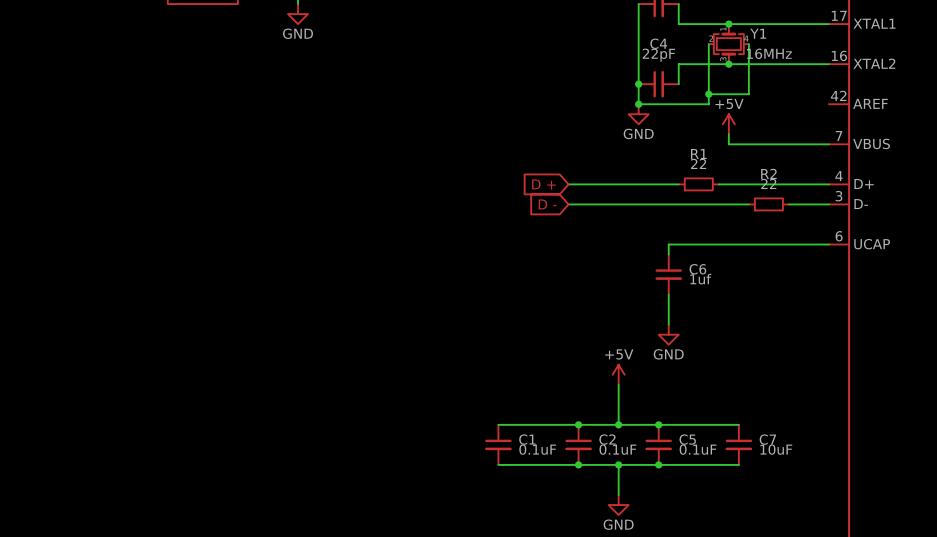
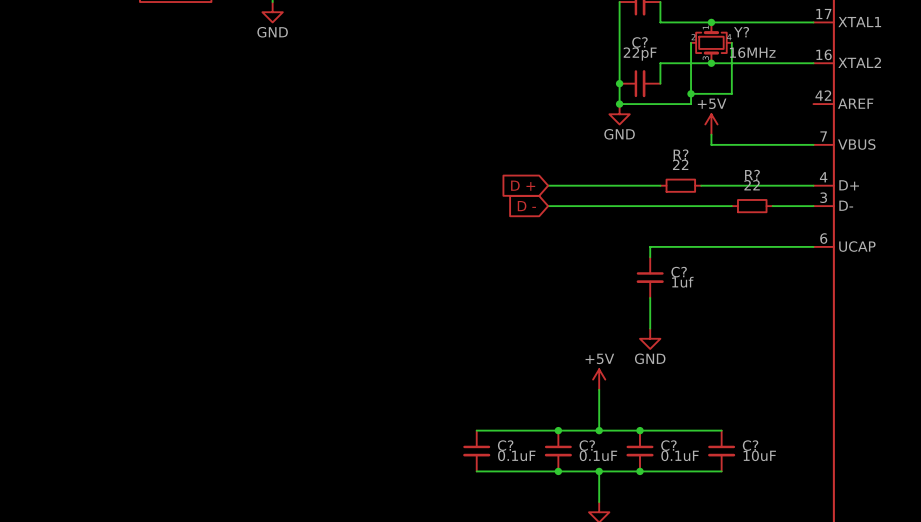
Y1 name: Y1 (758, 33) -> Y? (741, 32)
C4 name: C4 (658, 43) -> C? (639, 42)
R1 name: R1 (698, 153) -> R? (681, 154)
R2 name: R2 (768, 173) -> R? (752, 175)
C6 name: C6 (697, 269) -> C? (679, 272)
C1 name: C1 (527, 439) -> C? (505, 445)
C2 name: C2 (607, 439) -> C? (587, 445)
C5 name: C5 (687, 439) -> C? (668, 445)
C7 name: C7 (767, 439) -> C? (750, 445)

